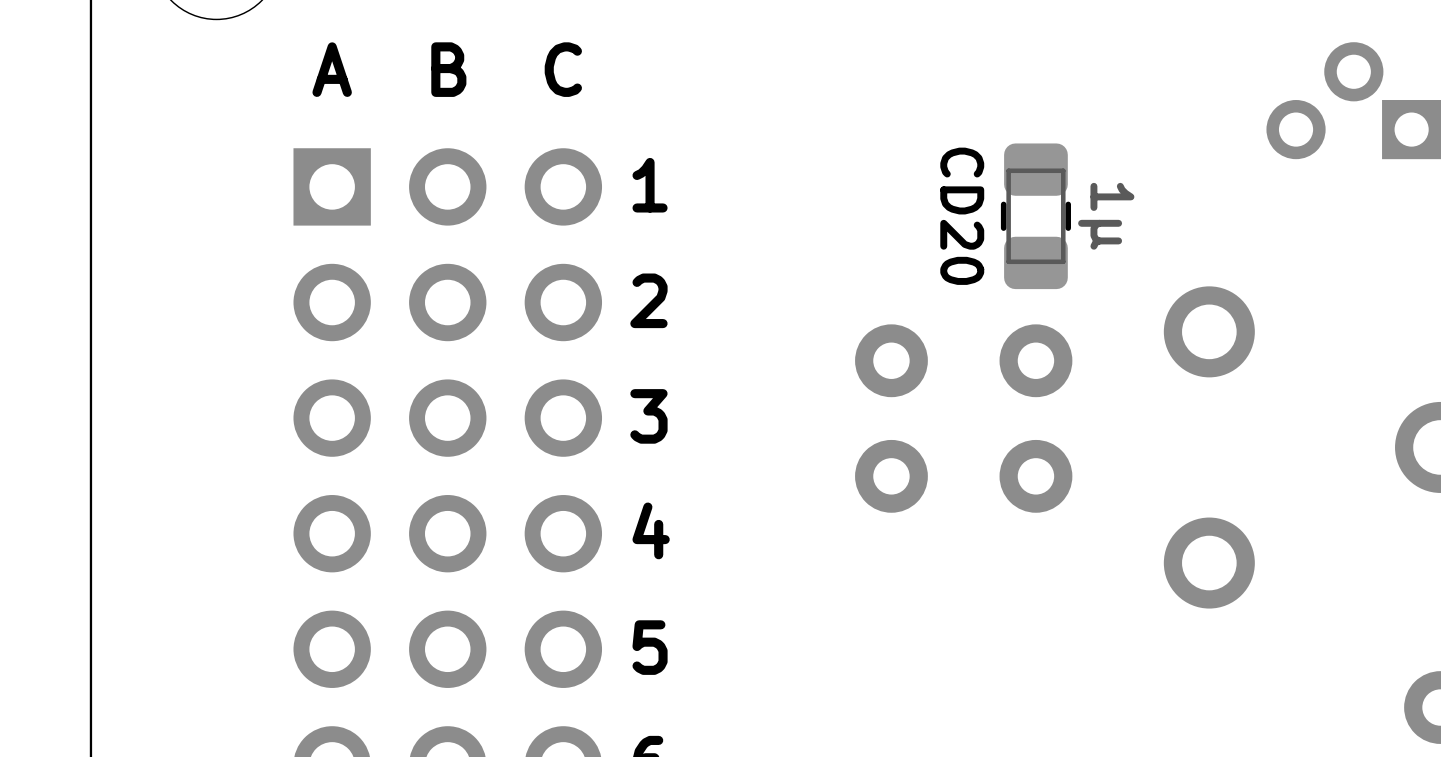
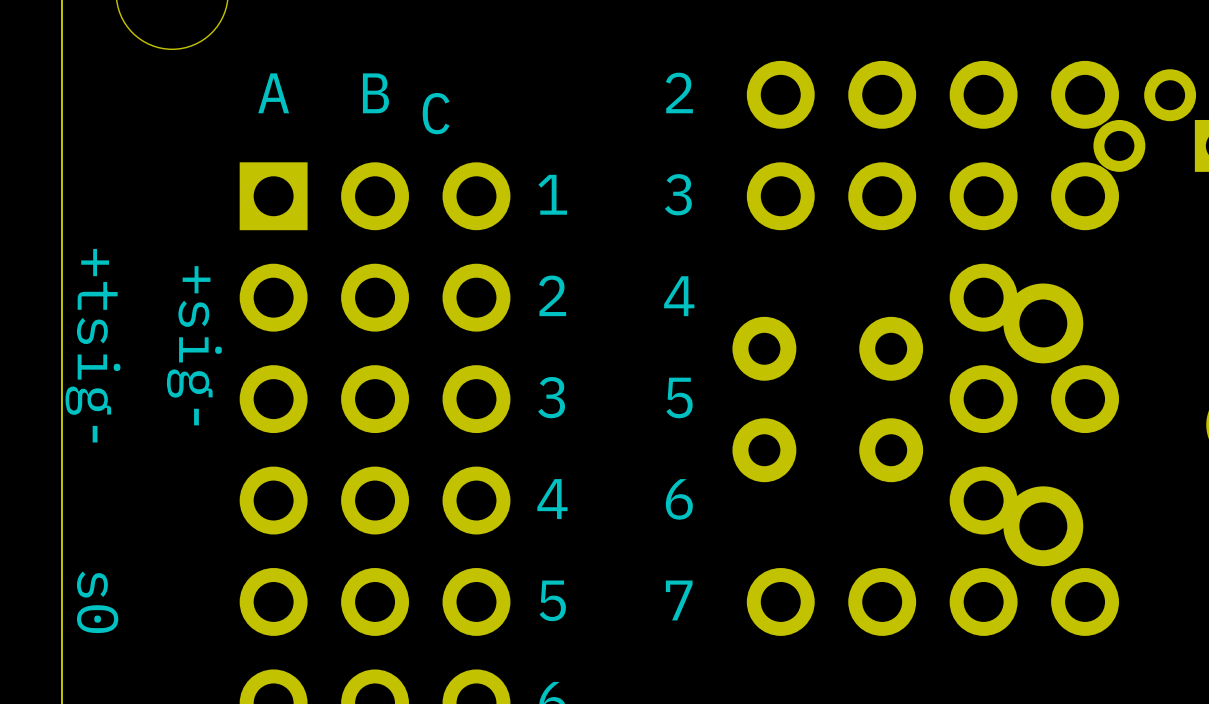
text position: C (563, 69) -> C (436, 113)
text: none -> 2 (679, 92)
part: none -> (780, 94)
part: none -> (882, 94)
part: none -> (983, 94)
part: none -> (1085, 94)
text: none -> 3 (678, 194)
part: none -> (780, 196)
part: none -> (882, 196)
part: none -> (983, 196)
part: none -> (1085, 196)
CD20: 1µ (1035, 216) -> none
text: none -> 4 (679, 296)
part: none -> (983, 297)
text: none -> +tsig- (92, 345)
text: none -> +sig- (194, 345)
text: none -> 5 (679, 397)
part: none -> (983, 399)
part: none -> (1085, 399)
text: none -> 6 (679, 499)
part: none -> (983, 500)
text: none -> 7 (679, 600)
text: none -> s0 (97, 602)
part: none -> (780, 601)
part: none -> (882, 601)
part: none -> (983, 601)
part: none -> (1085, 601)

